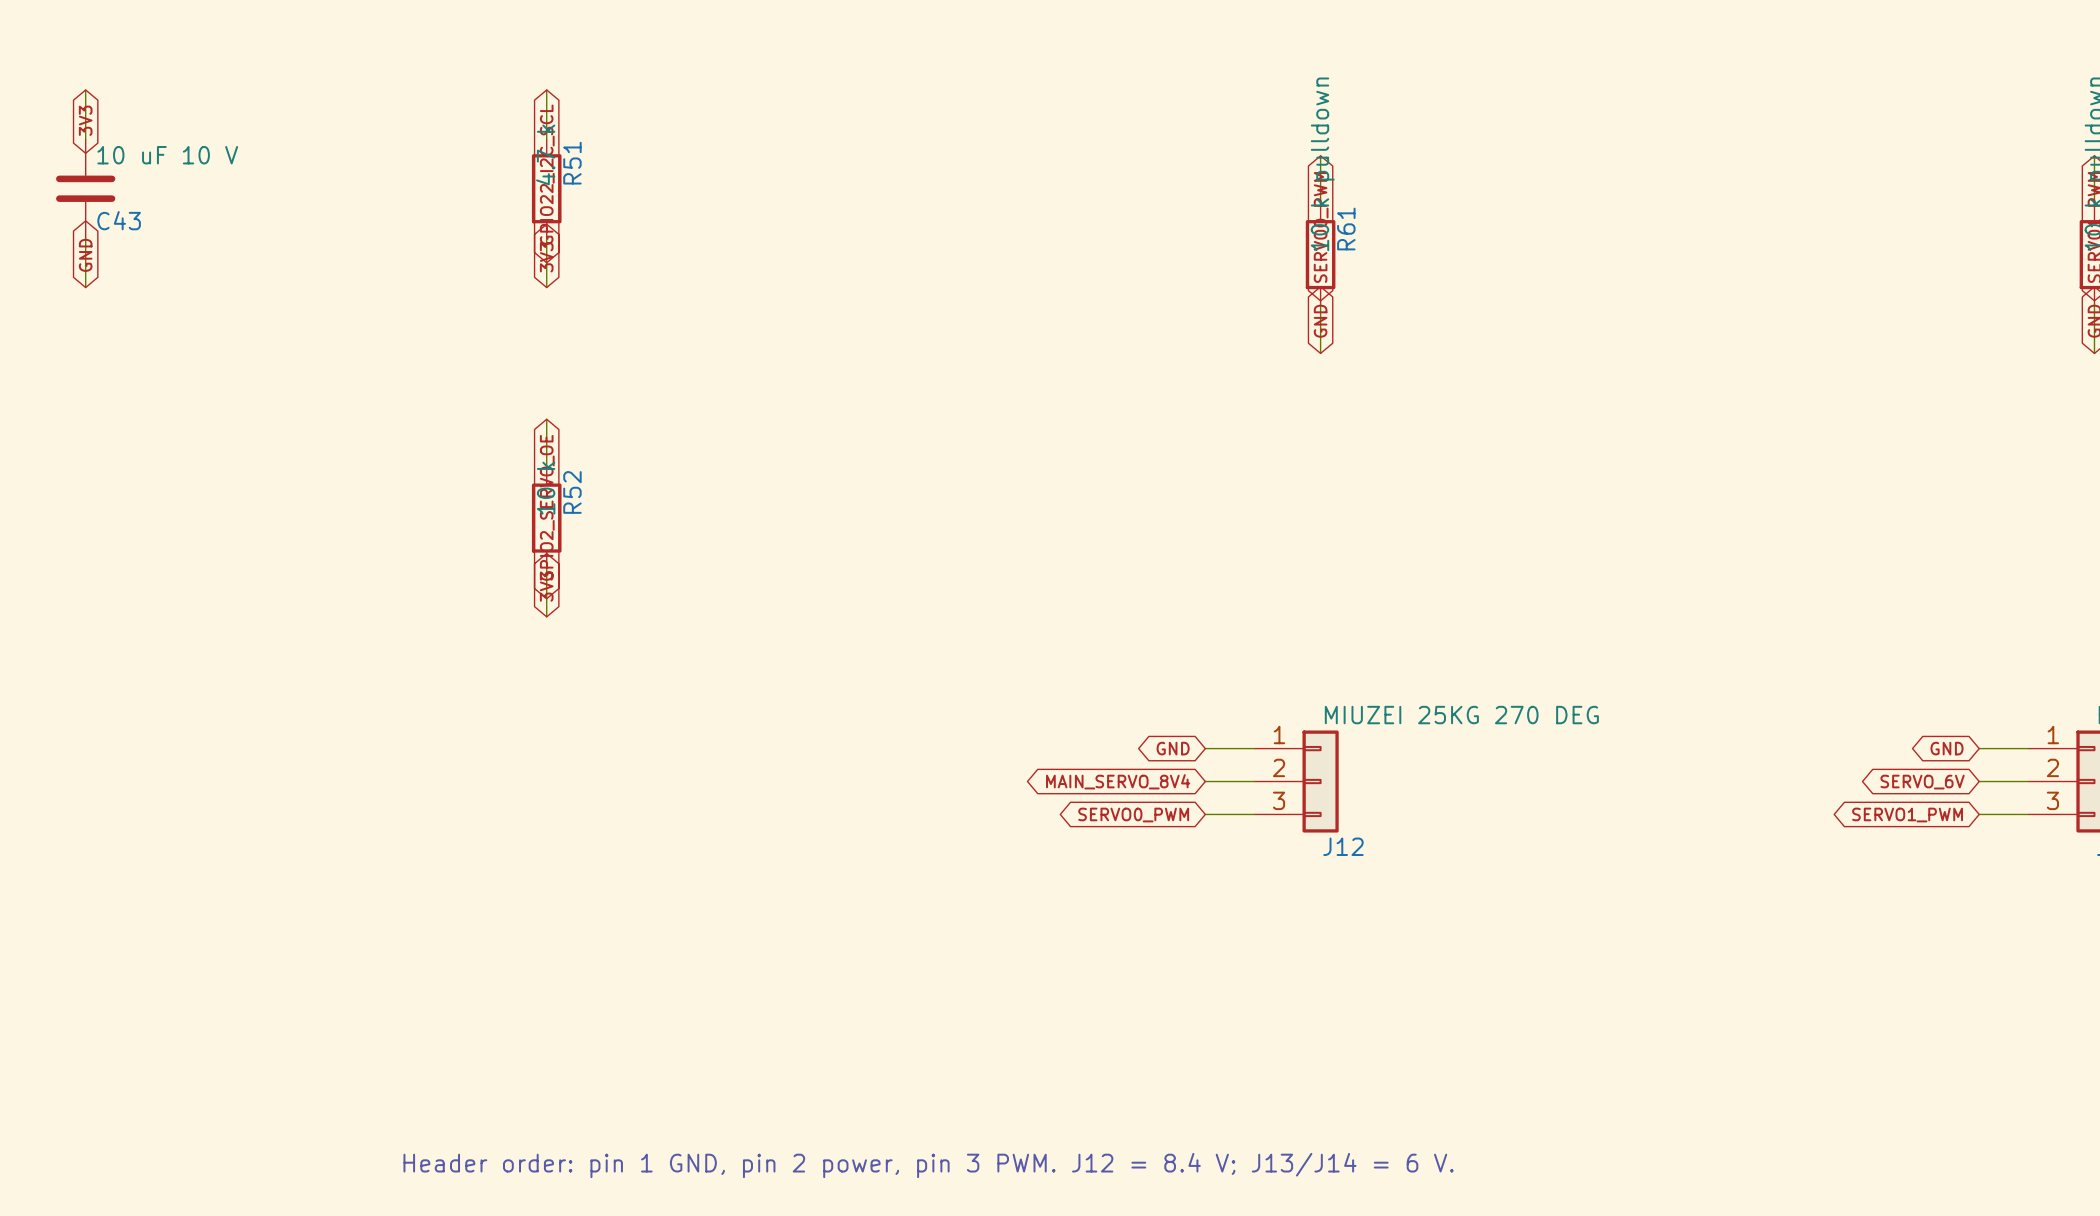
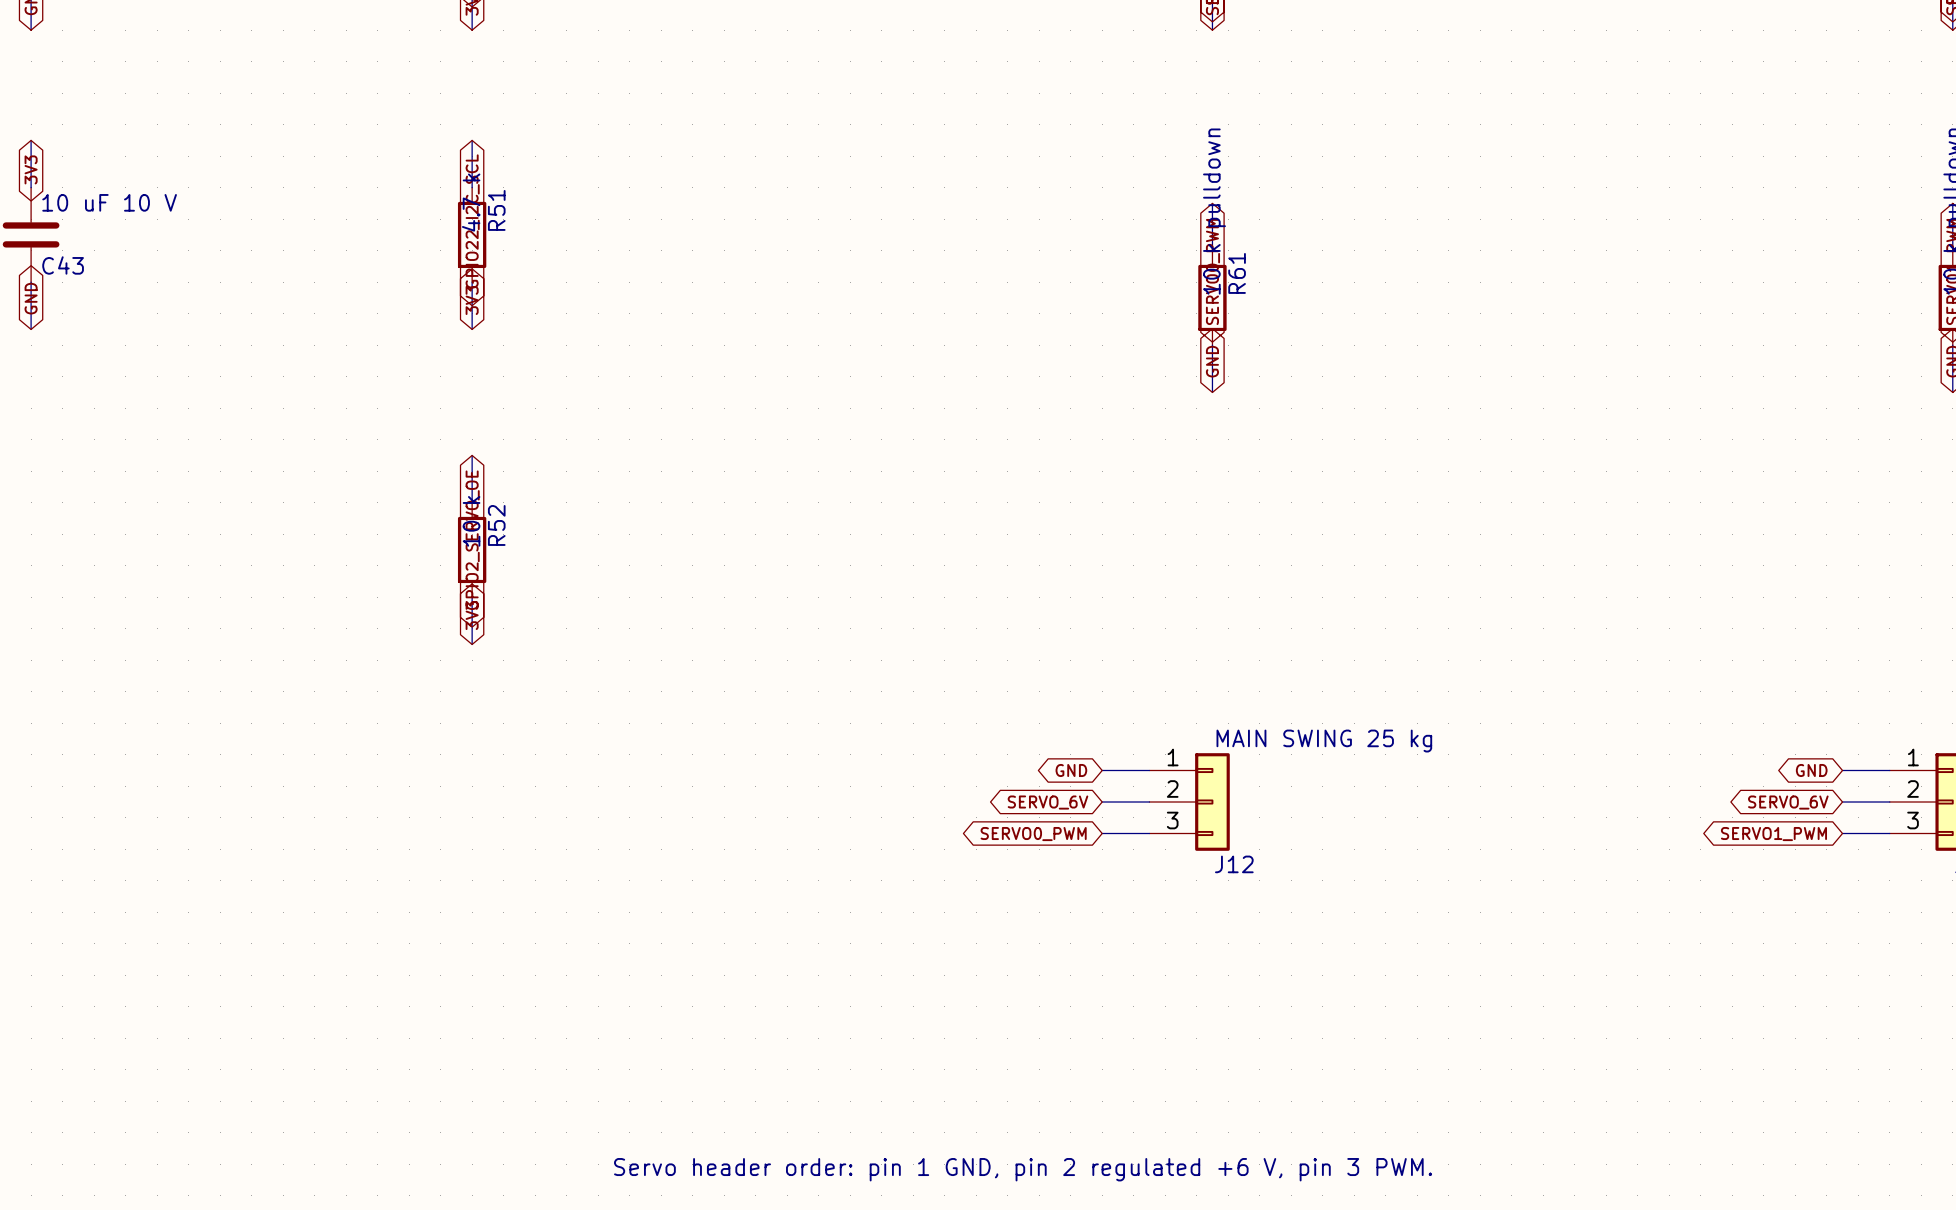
J12 value: MIUZEI 25KG 270 DEG (1461, 715) -> MAIN SWING 25 kg (1324, 741)
global label: MAIN_SERVO_8V4 (1118, 781) -> SERVO_6V (1047, 802)
text: Header order: pin 1 GND, pin 2 power, pin 3 PWM. J12 = 8.4 V; J13/J14 = 6 V. (928, 1165) -> Servo header order: pin 1 GND, pin 2 regulated +6 V, pin 3 PWM. (1023, 1169)

